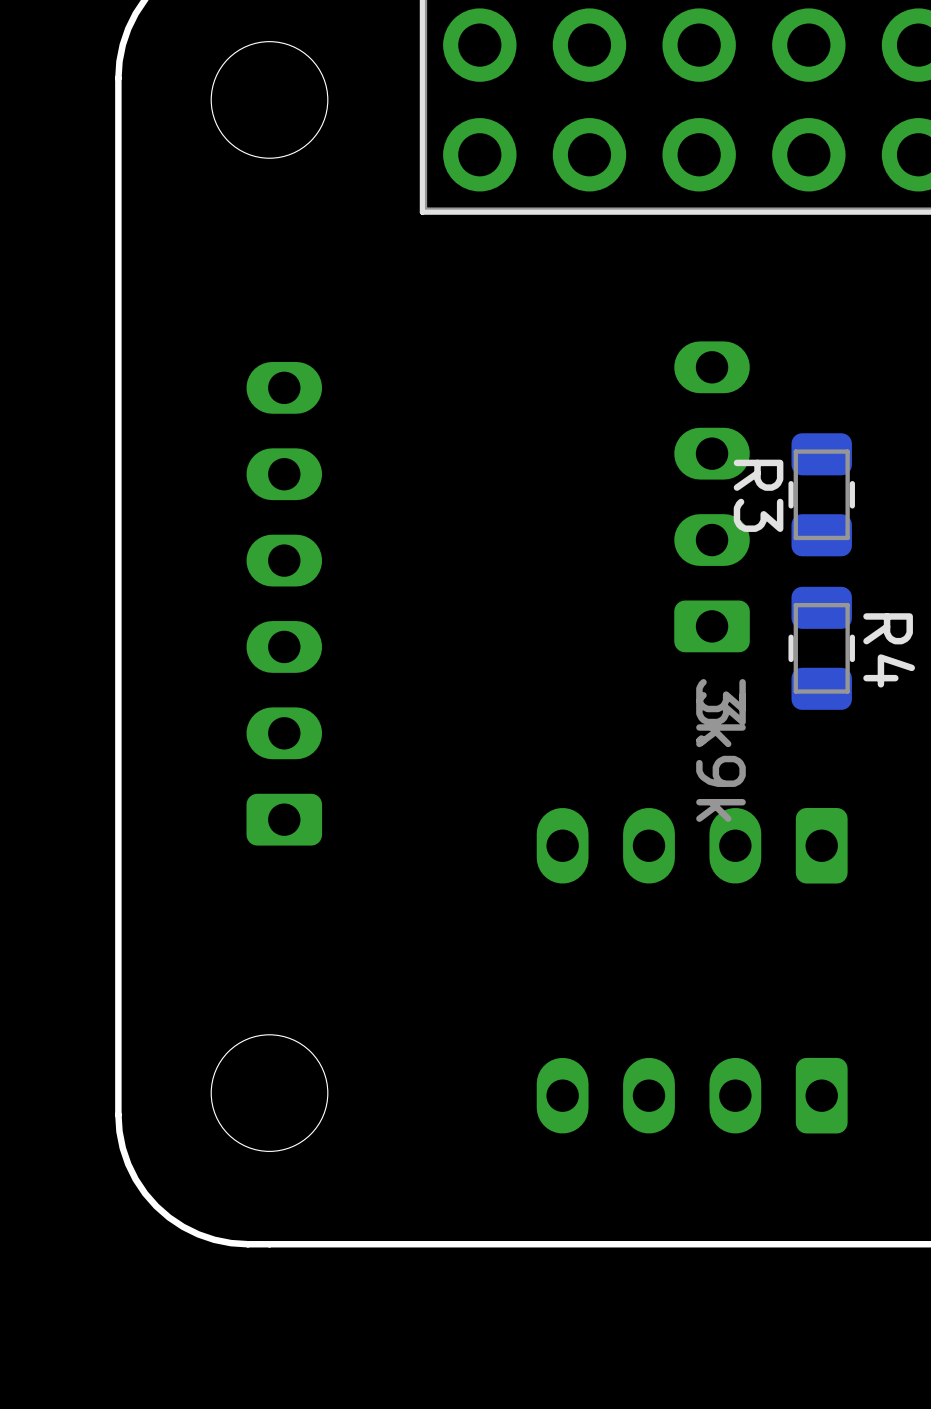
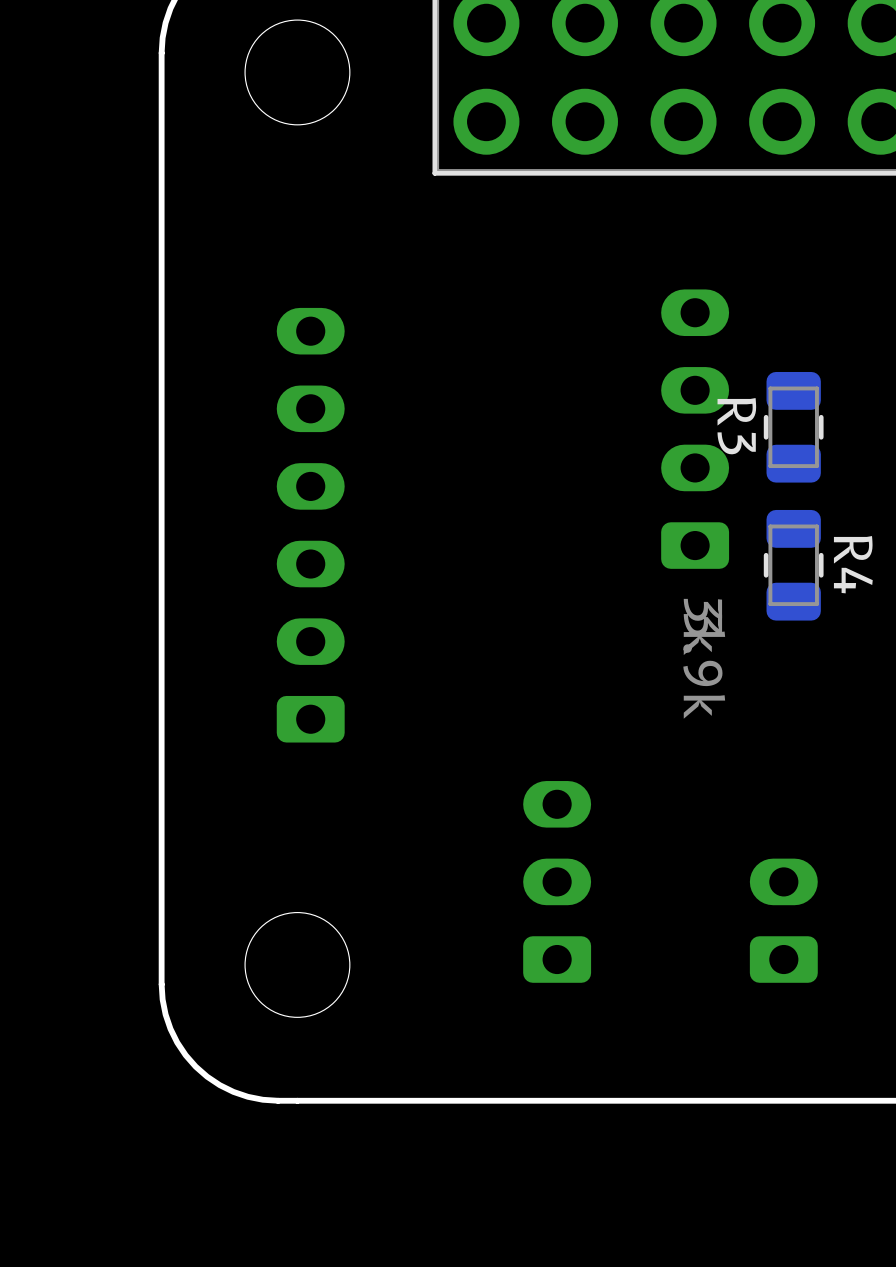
part: (692, 845) -> none
part: none -> (557, 881)
part: none -> (783, 920)
part: (692, 1095) -> none

